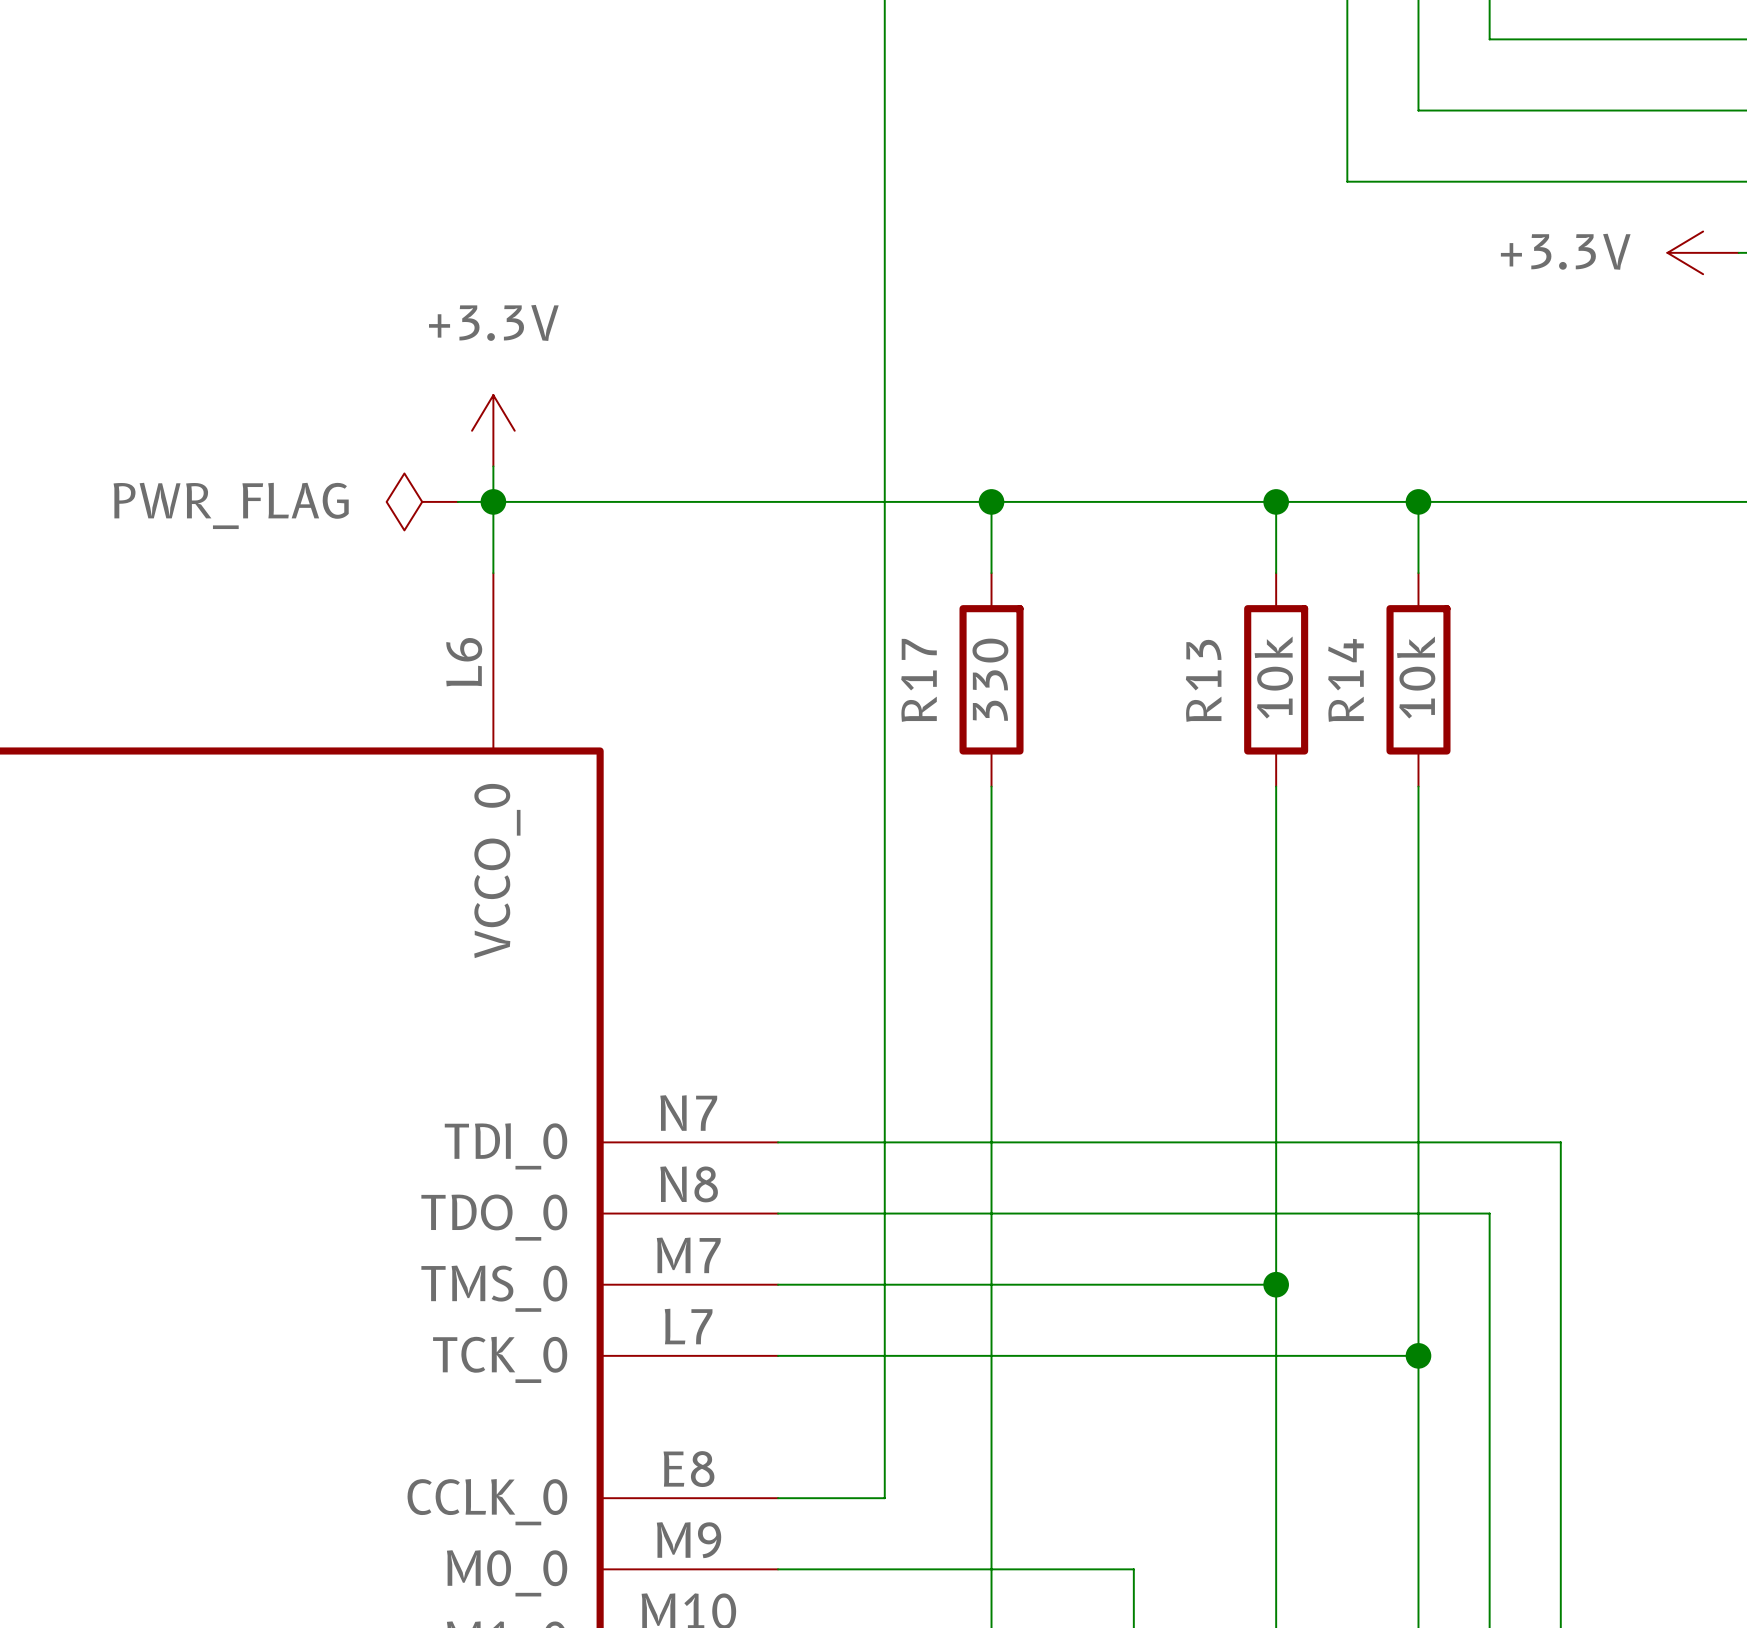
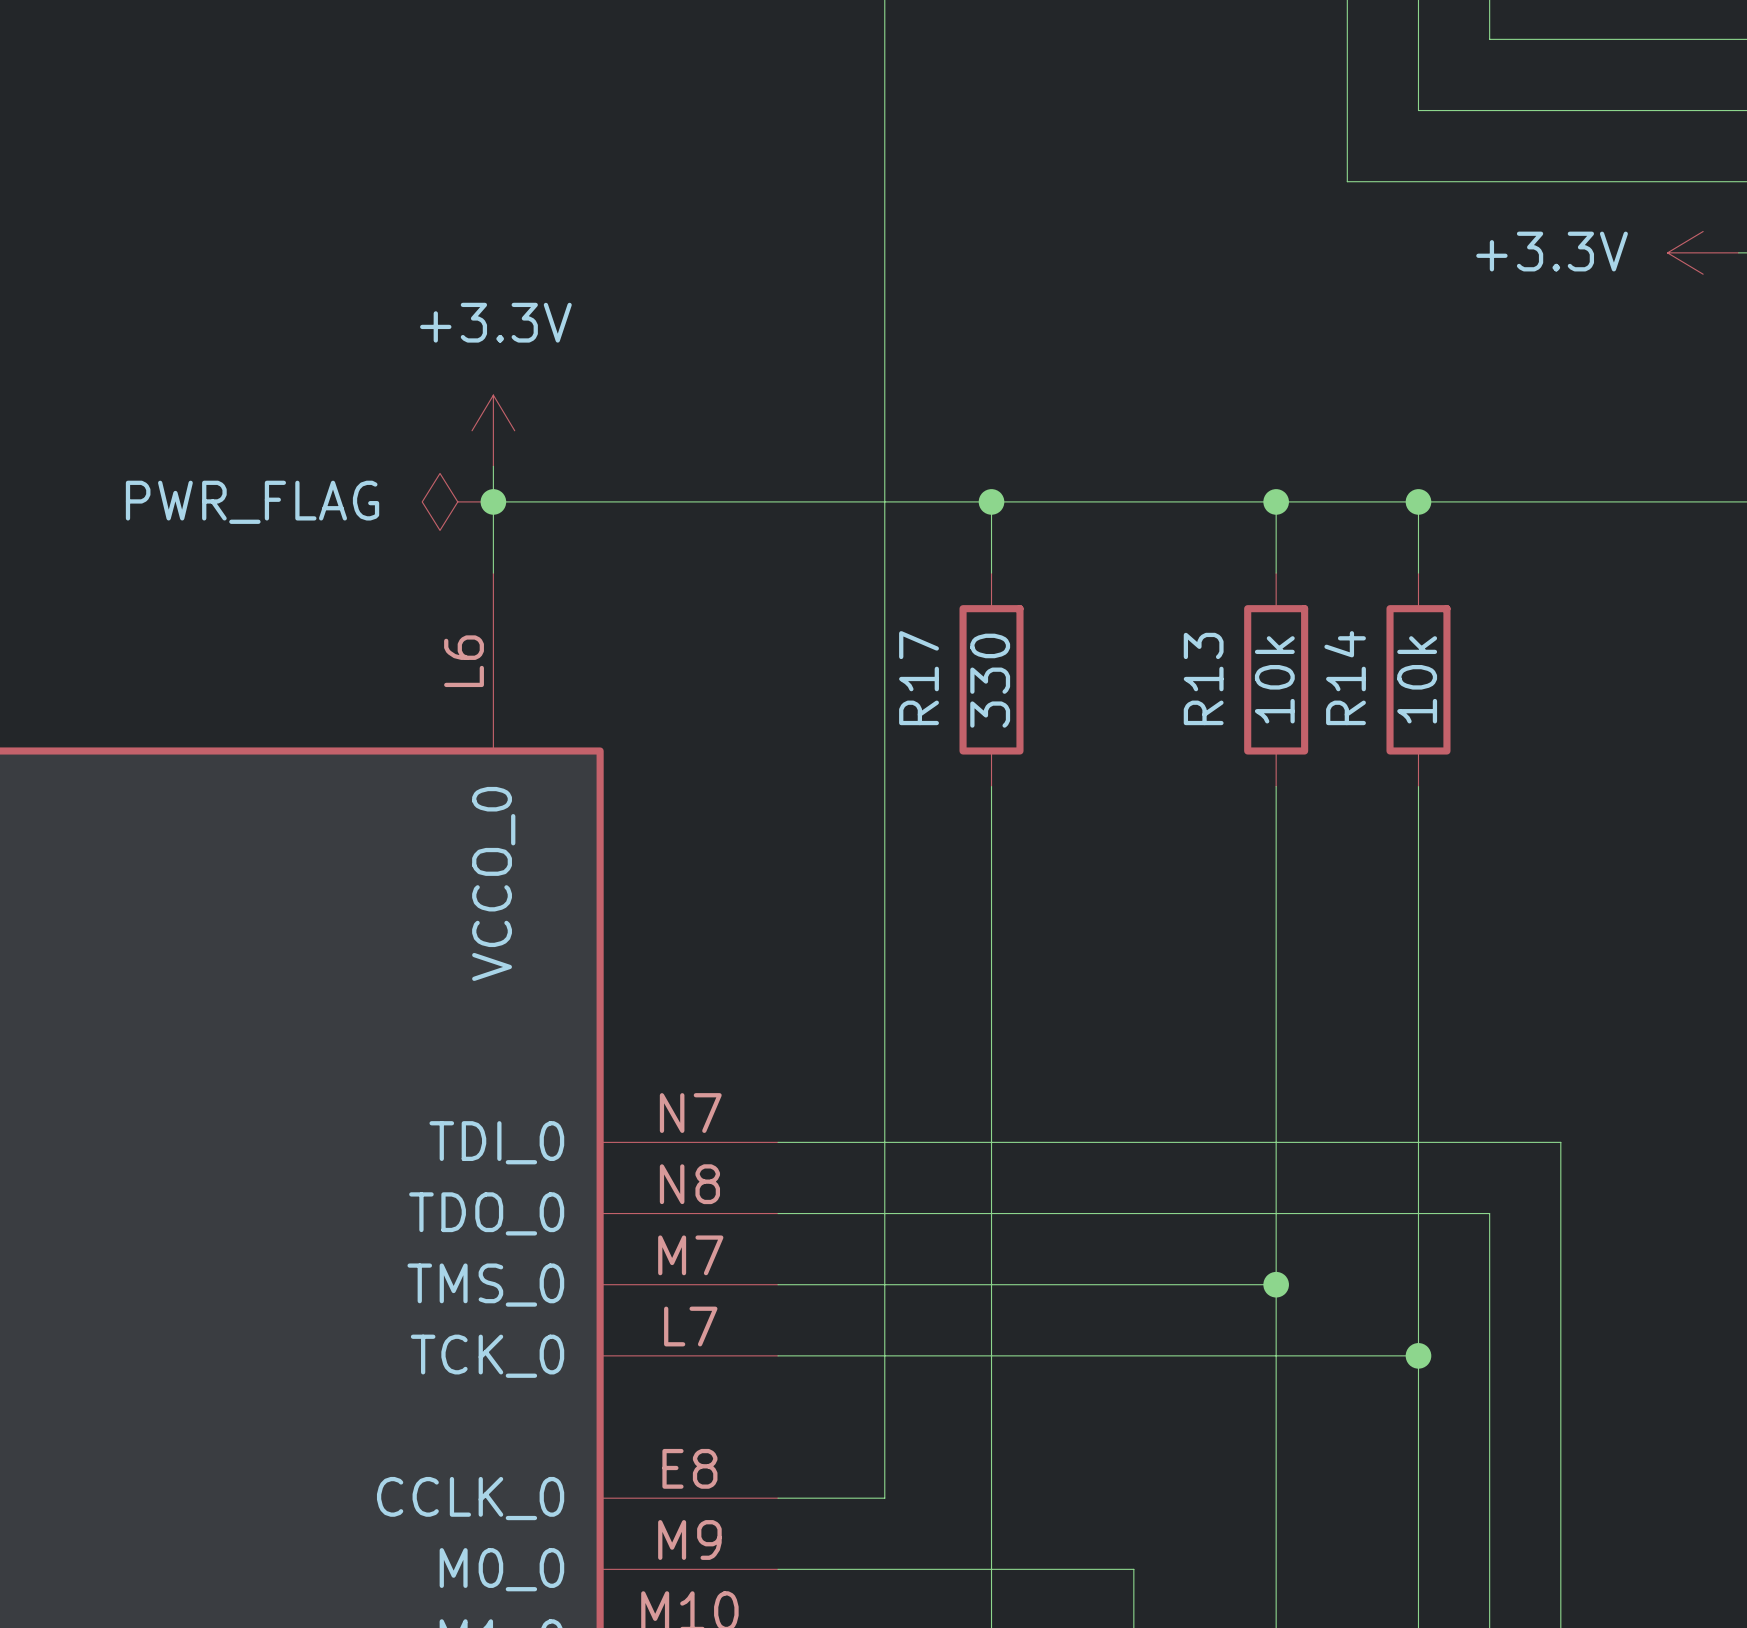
power symbol position: PWR_FLAG (422, 501) -> PWR_FLAG (457, 501)

